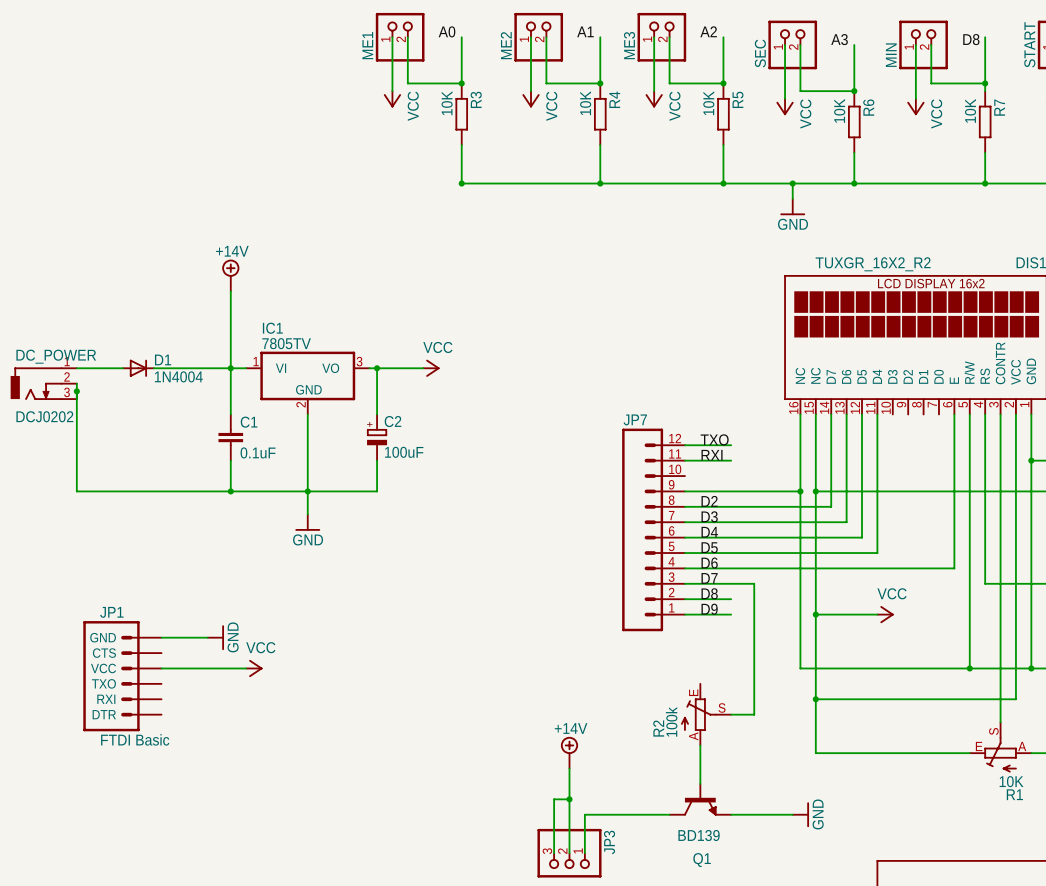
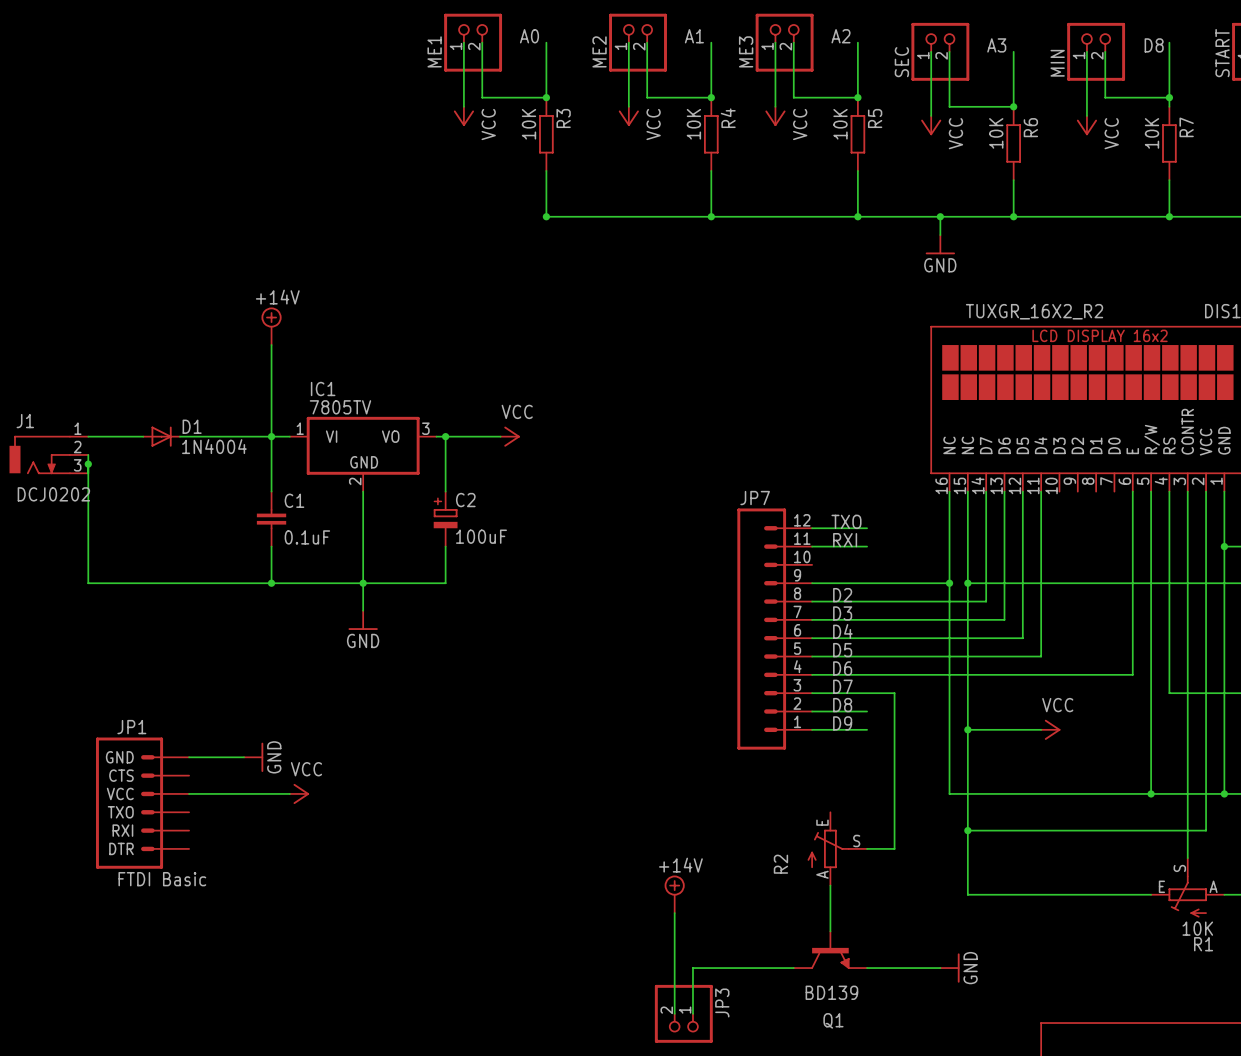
DC_POWER name: DC_POWER (56, 356) -> J1 (25, 421)
R2 value: 100k (671, 721) -> none
wire: (569, 799) (554, 799) (554, 853) -> none
junction: (569, 799) -> none
JP3 symbol: [537, 828, 602, 878] -> [654, 984, 713, 1043]

